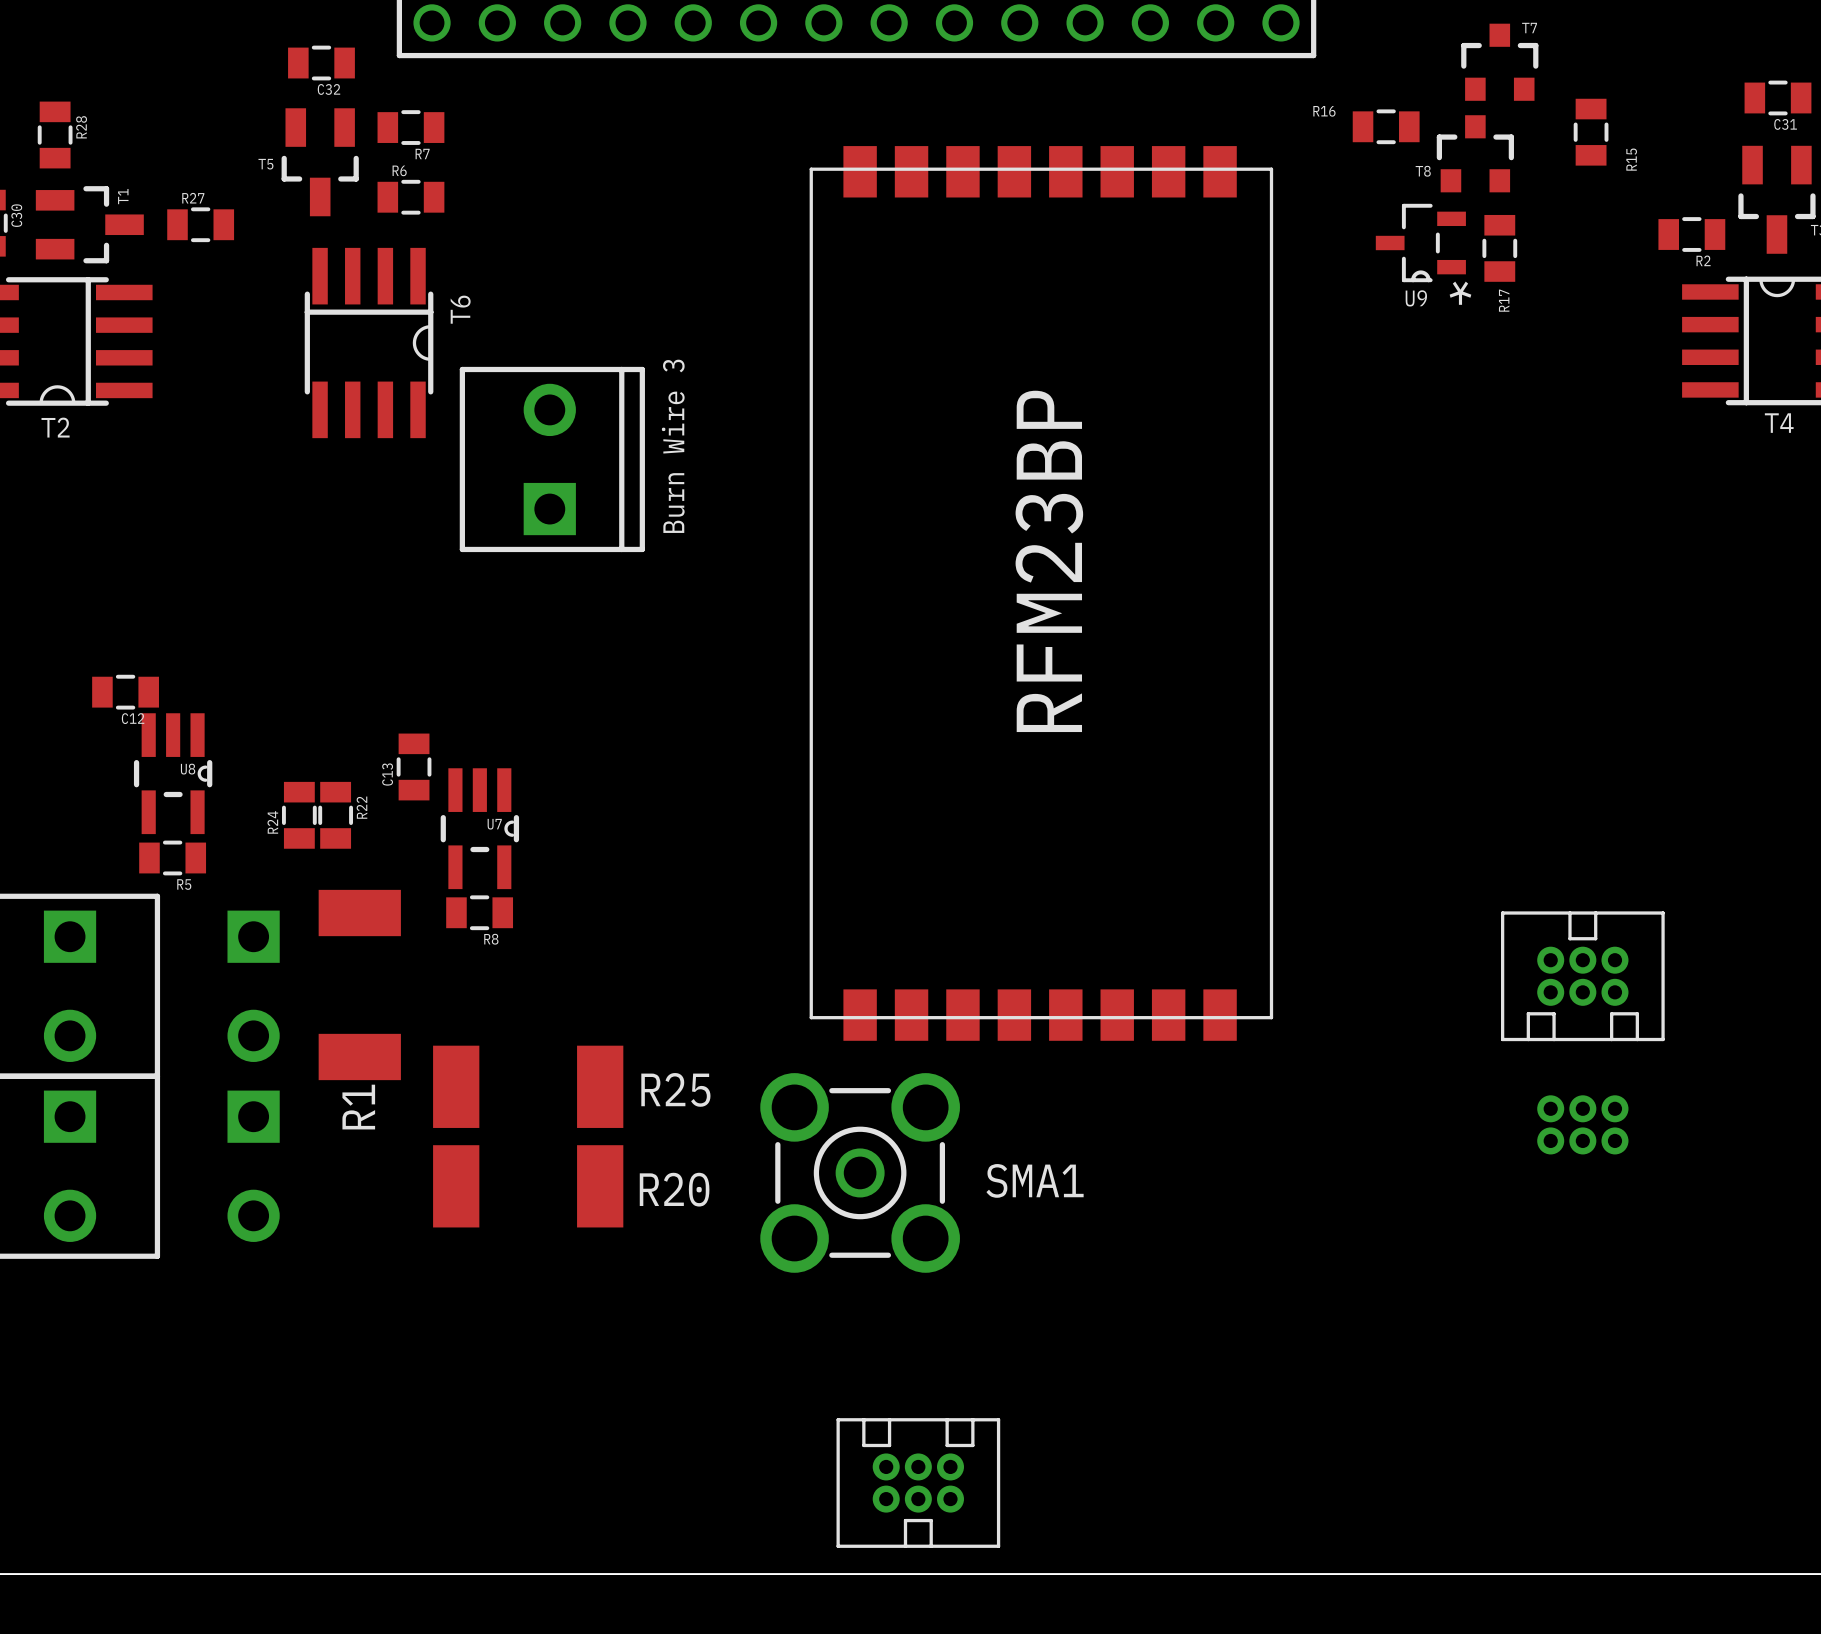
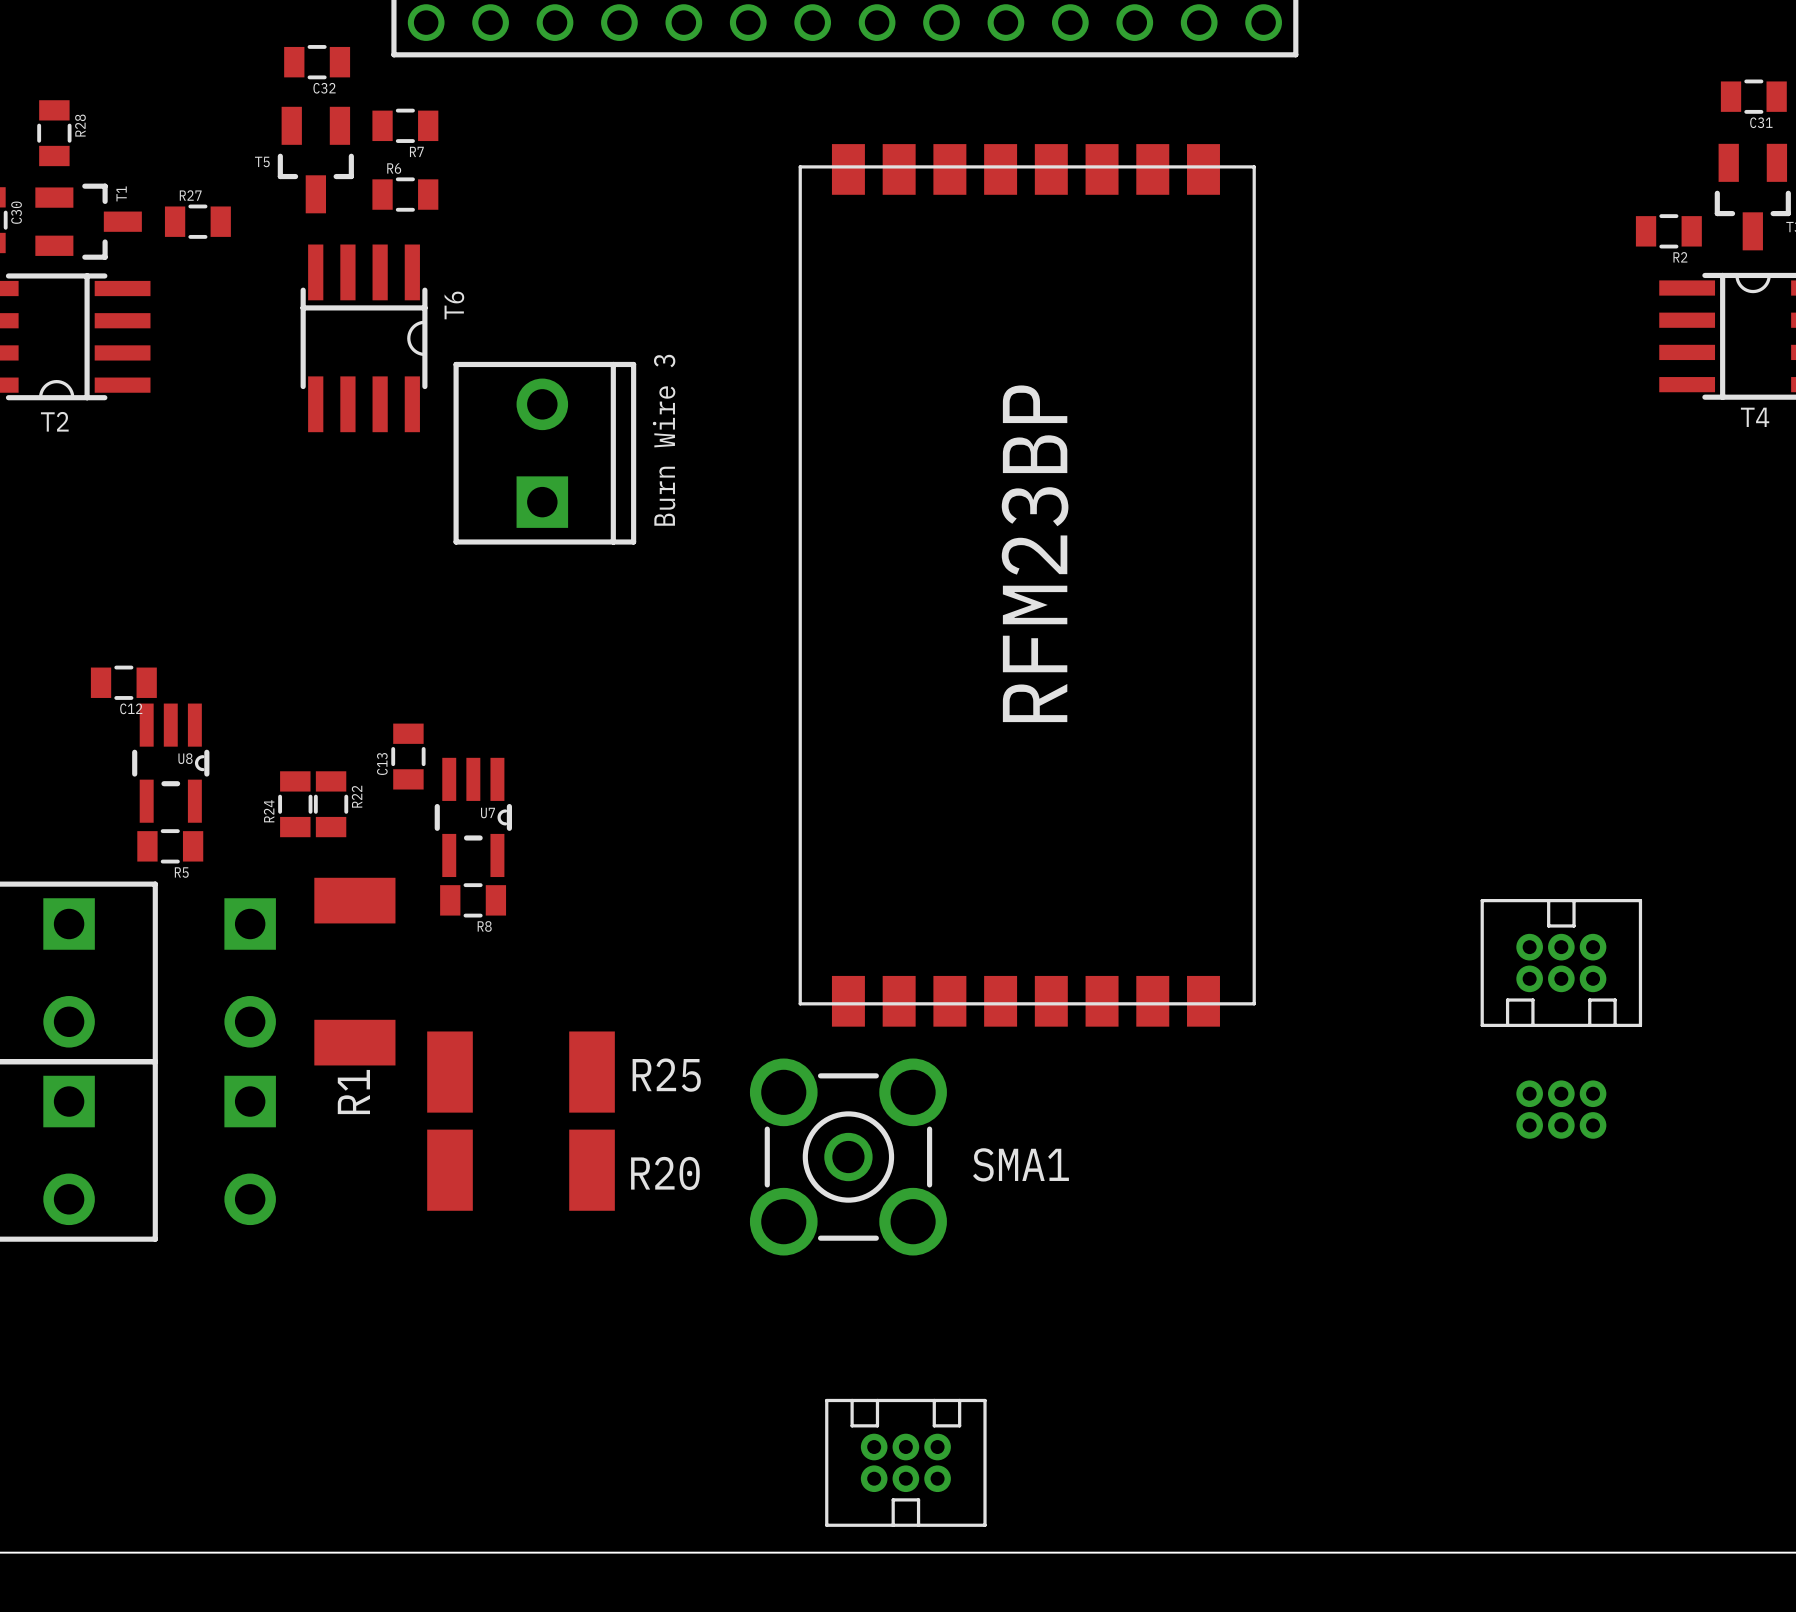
T7: (1499, 62) -> none
R16: (1386, 126) -> none
R15: (1591, 132) -> none
T8: (1475, 153) -> none
U9: (1420, 242) -> none
R17: (1499, 248) -> none

